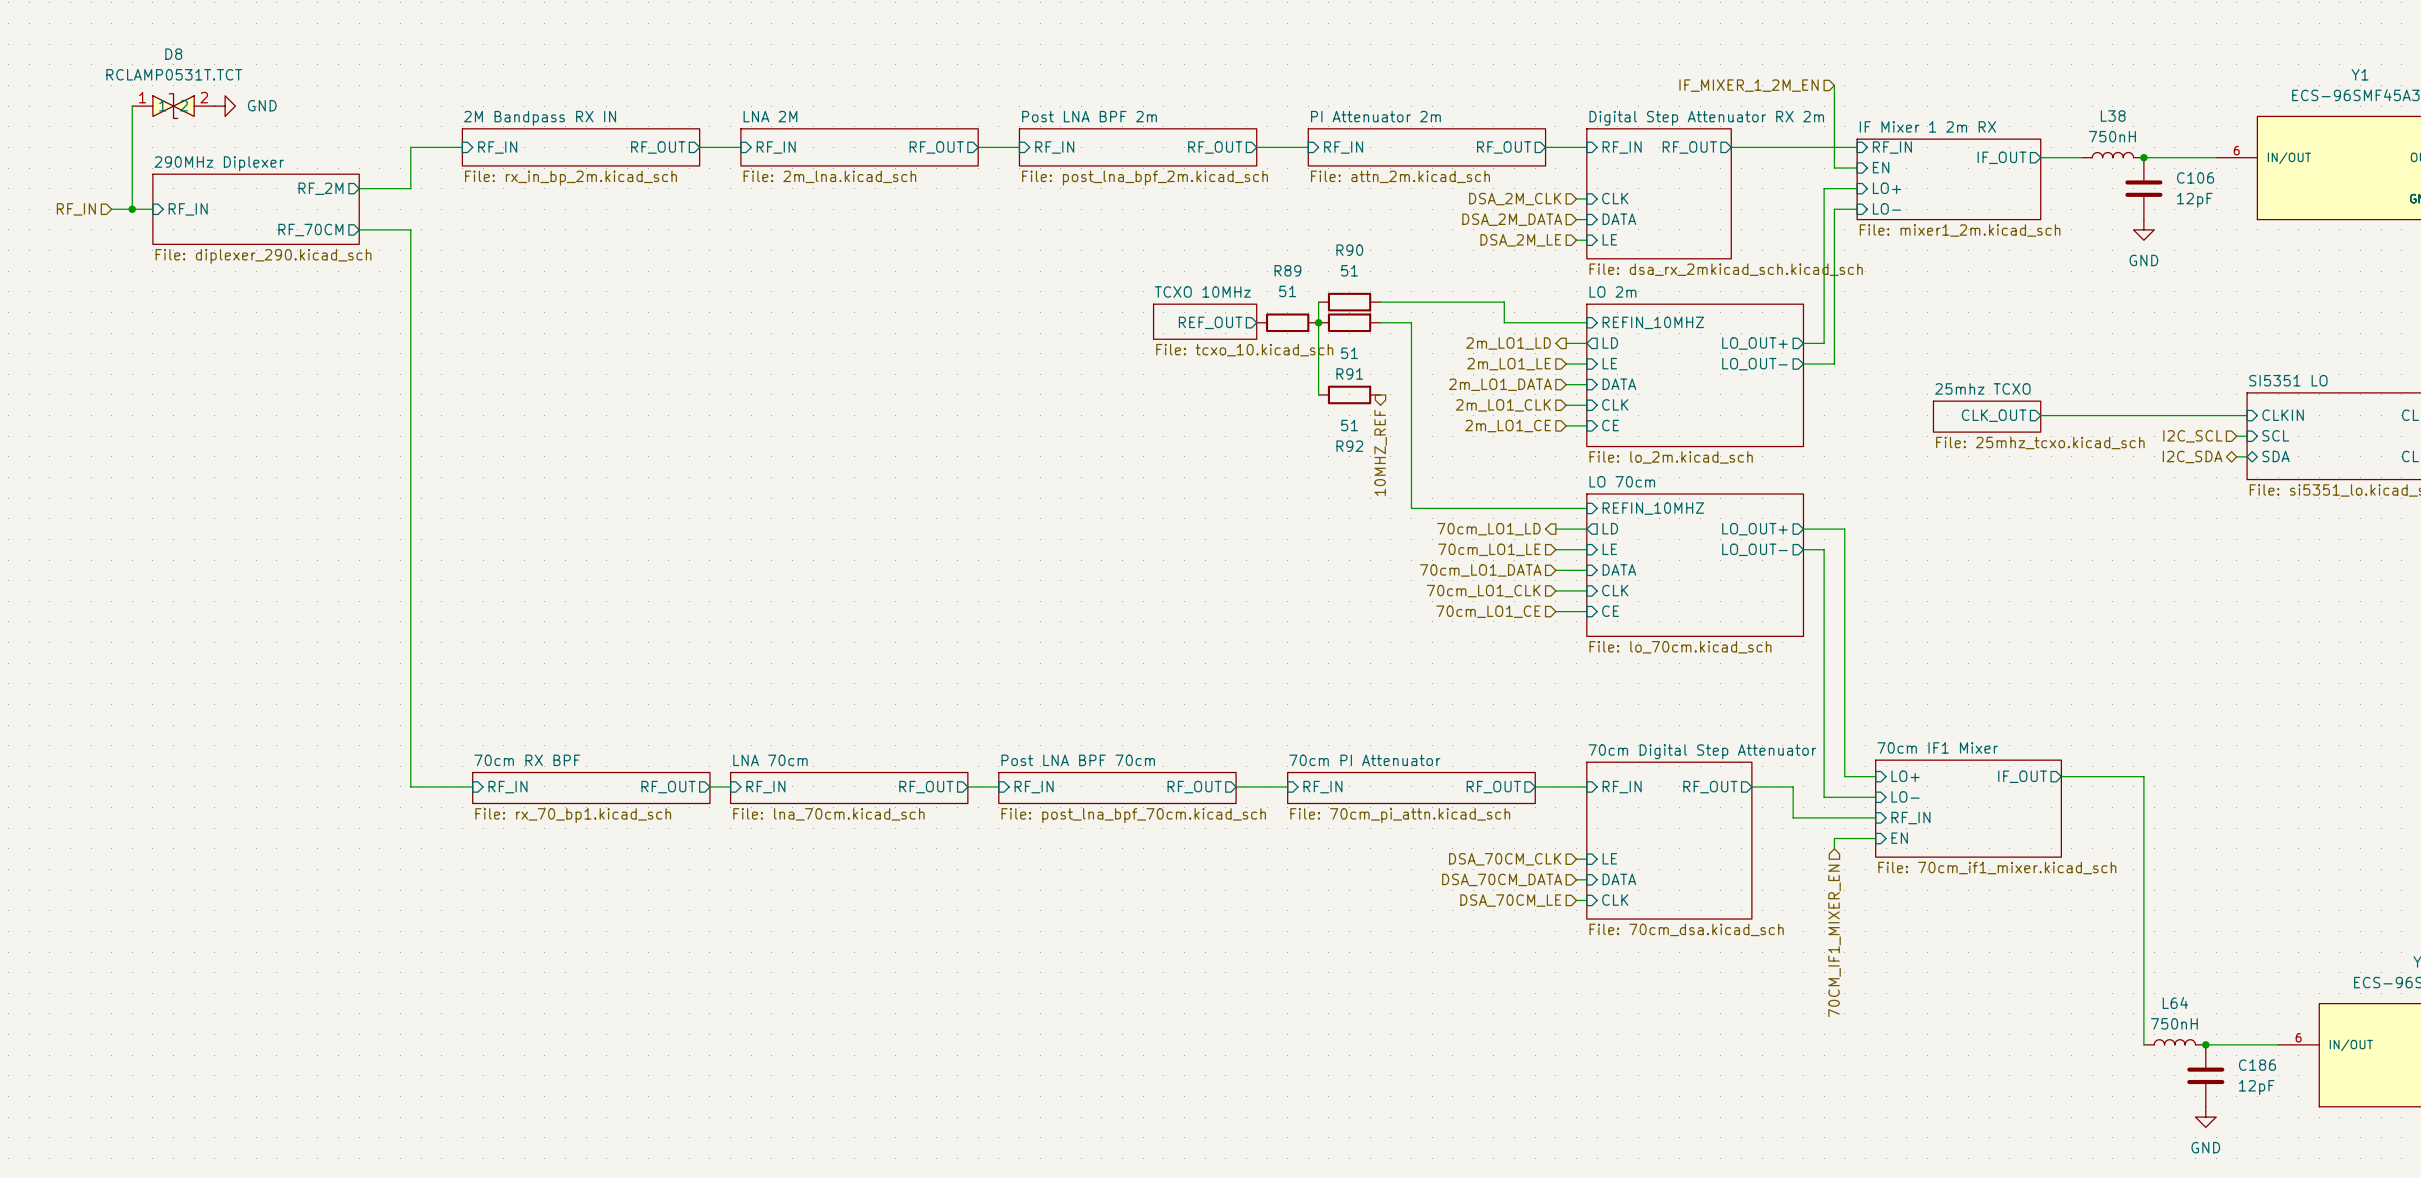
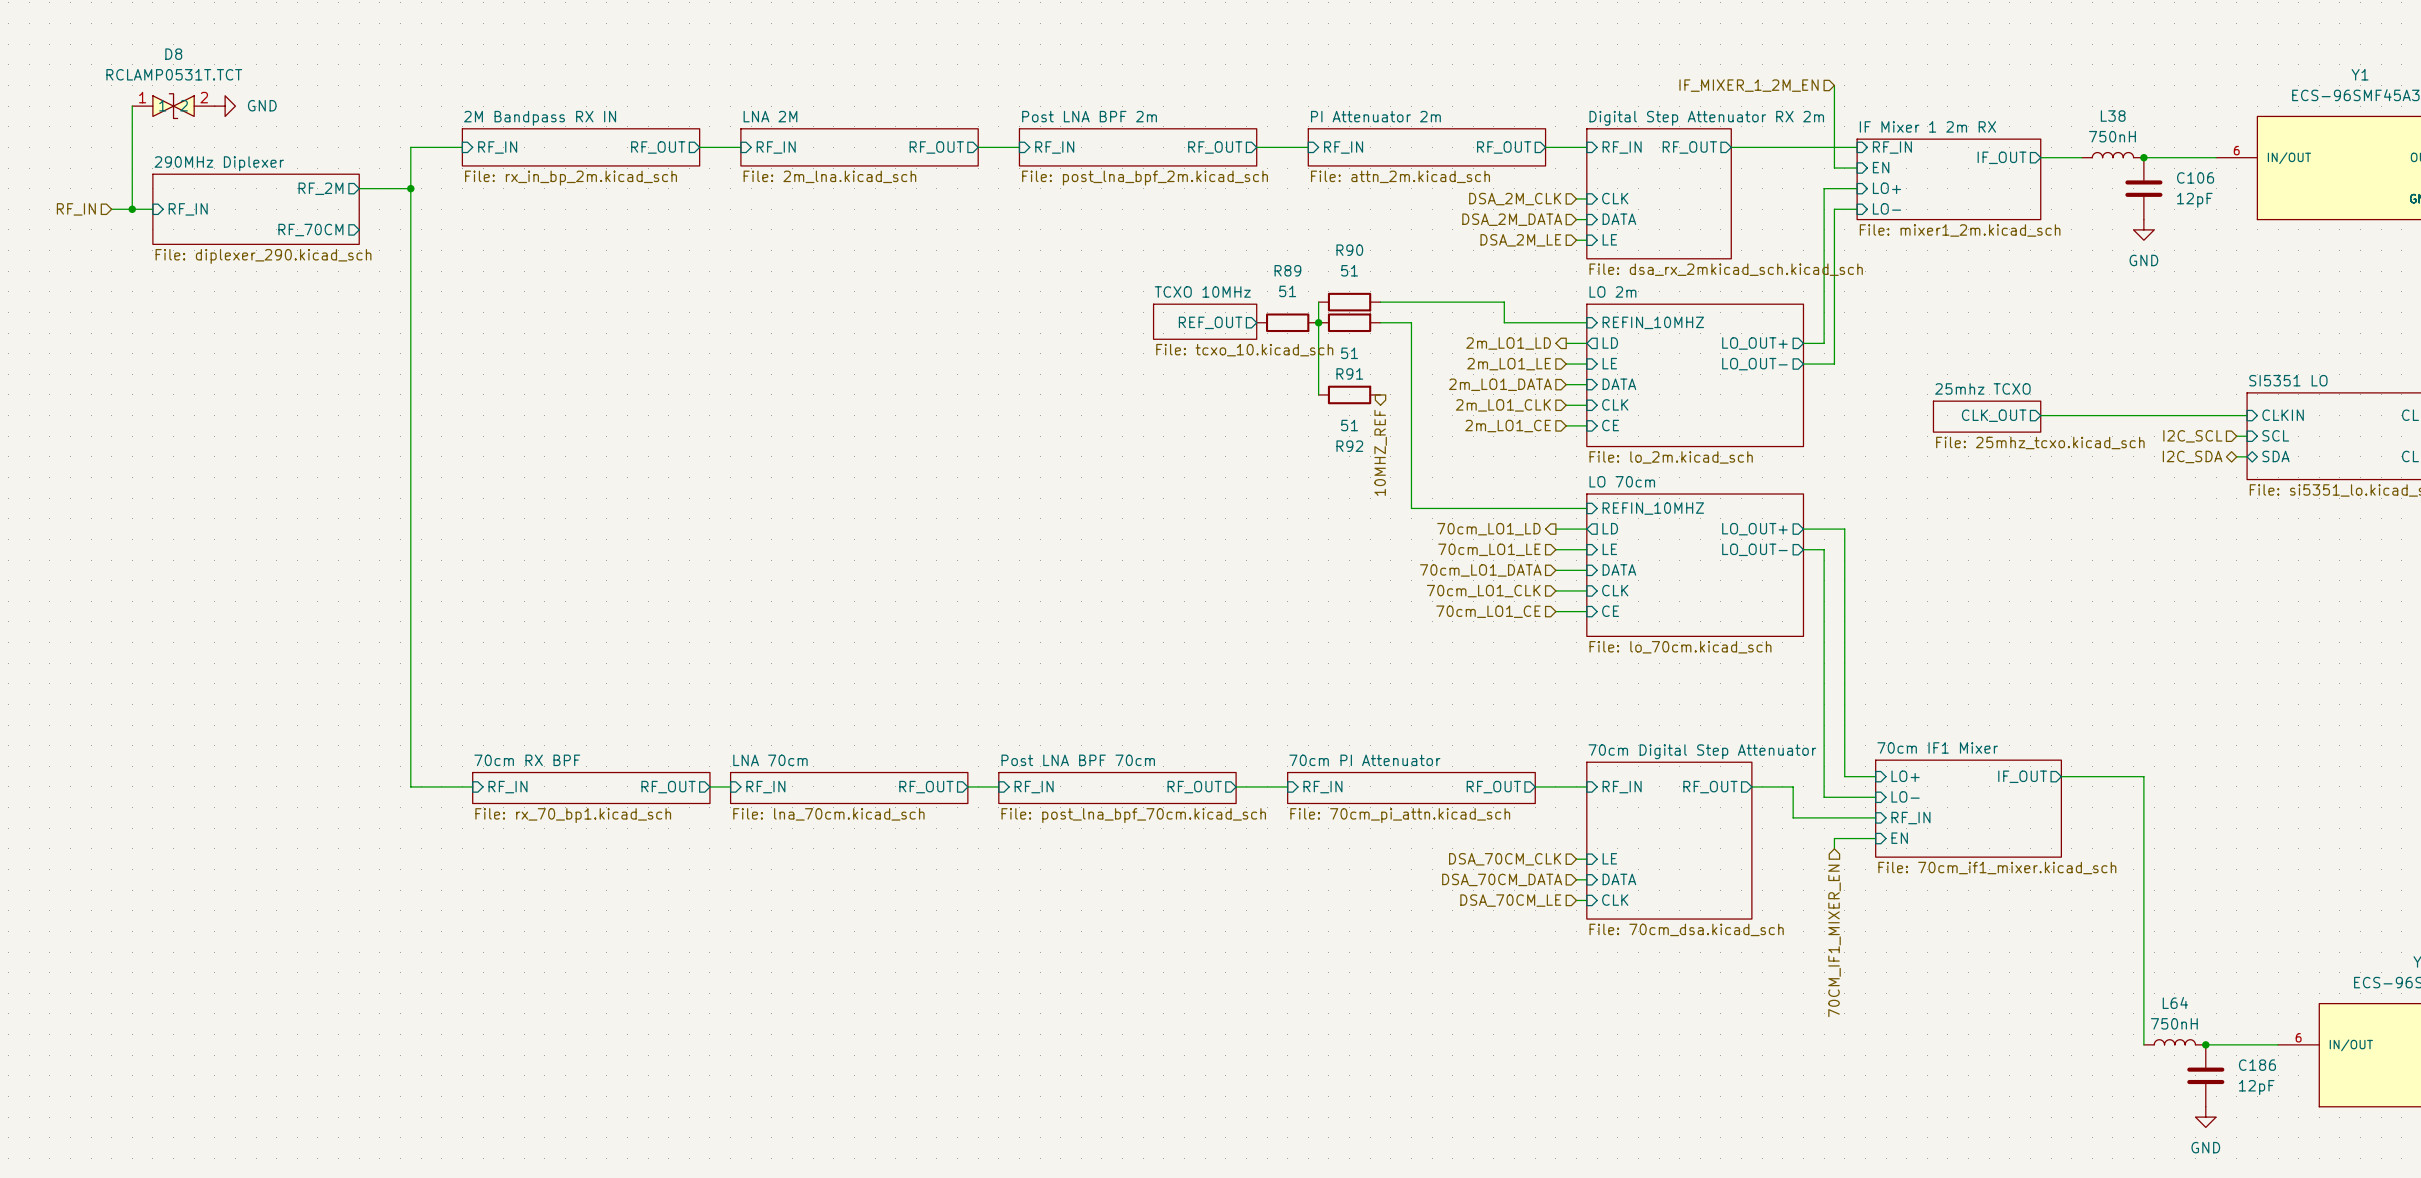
junction: none -> (410, 188)
wire: (359, 229) (410, 229) -> (410, 188) (410, 229)

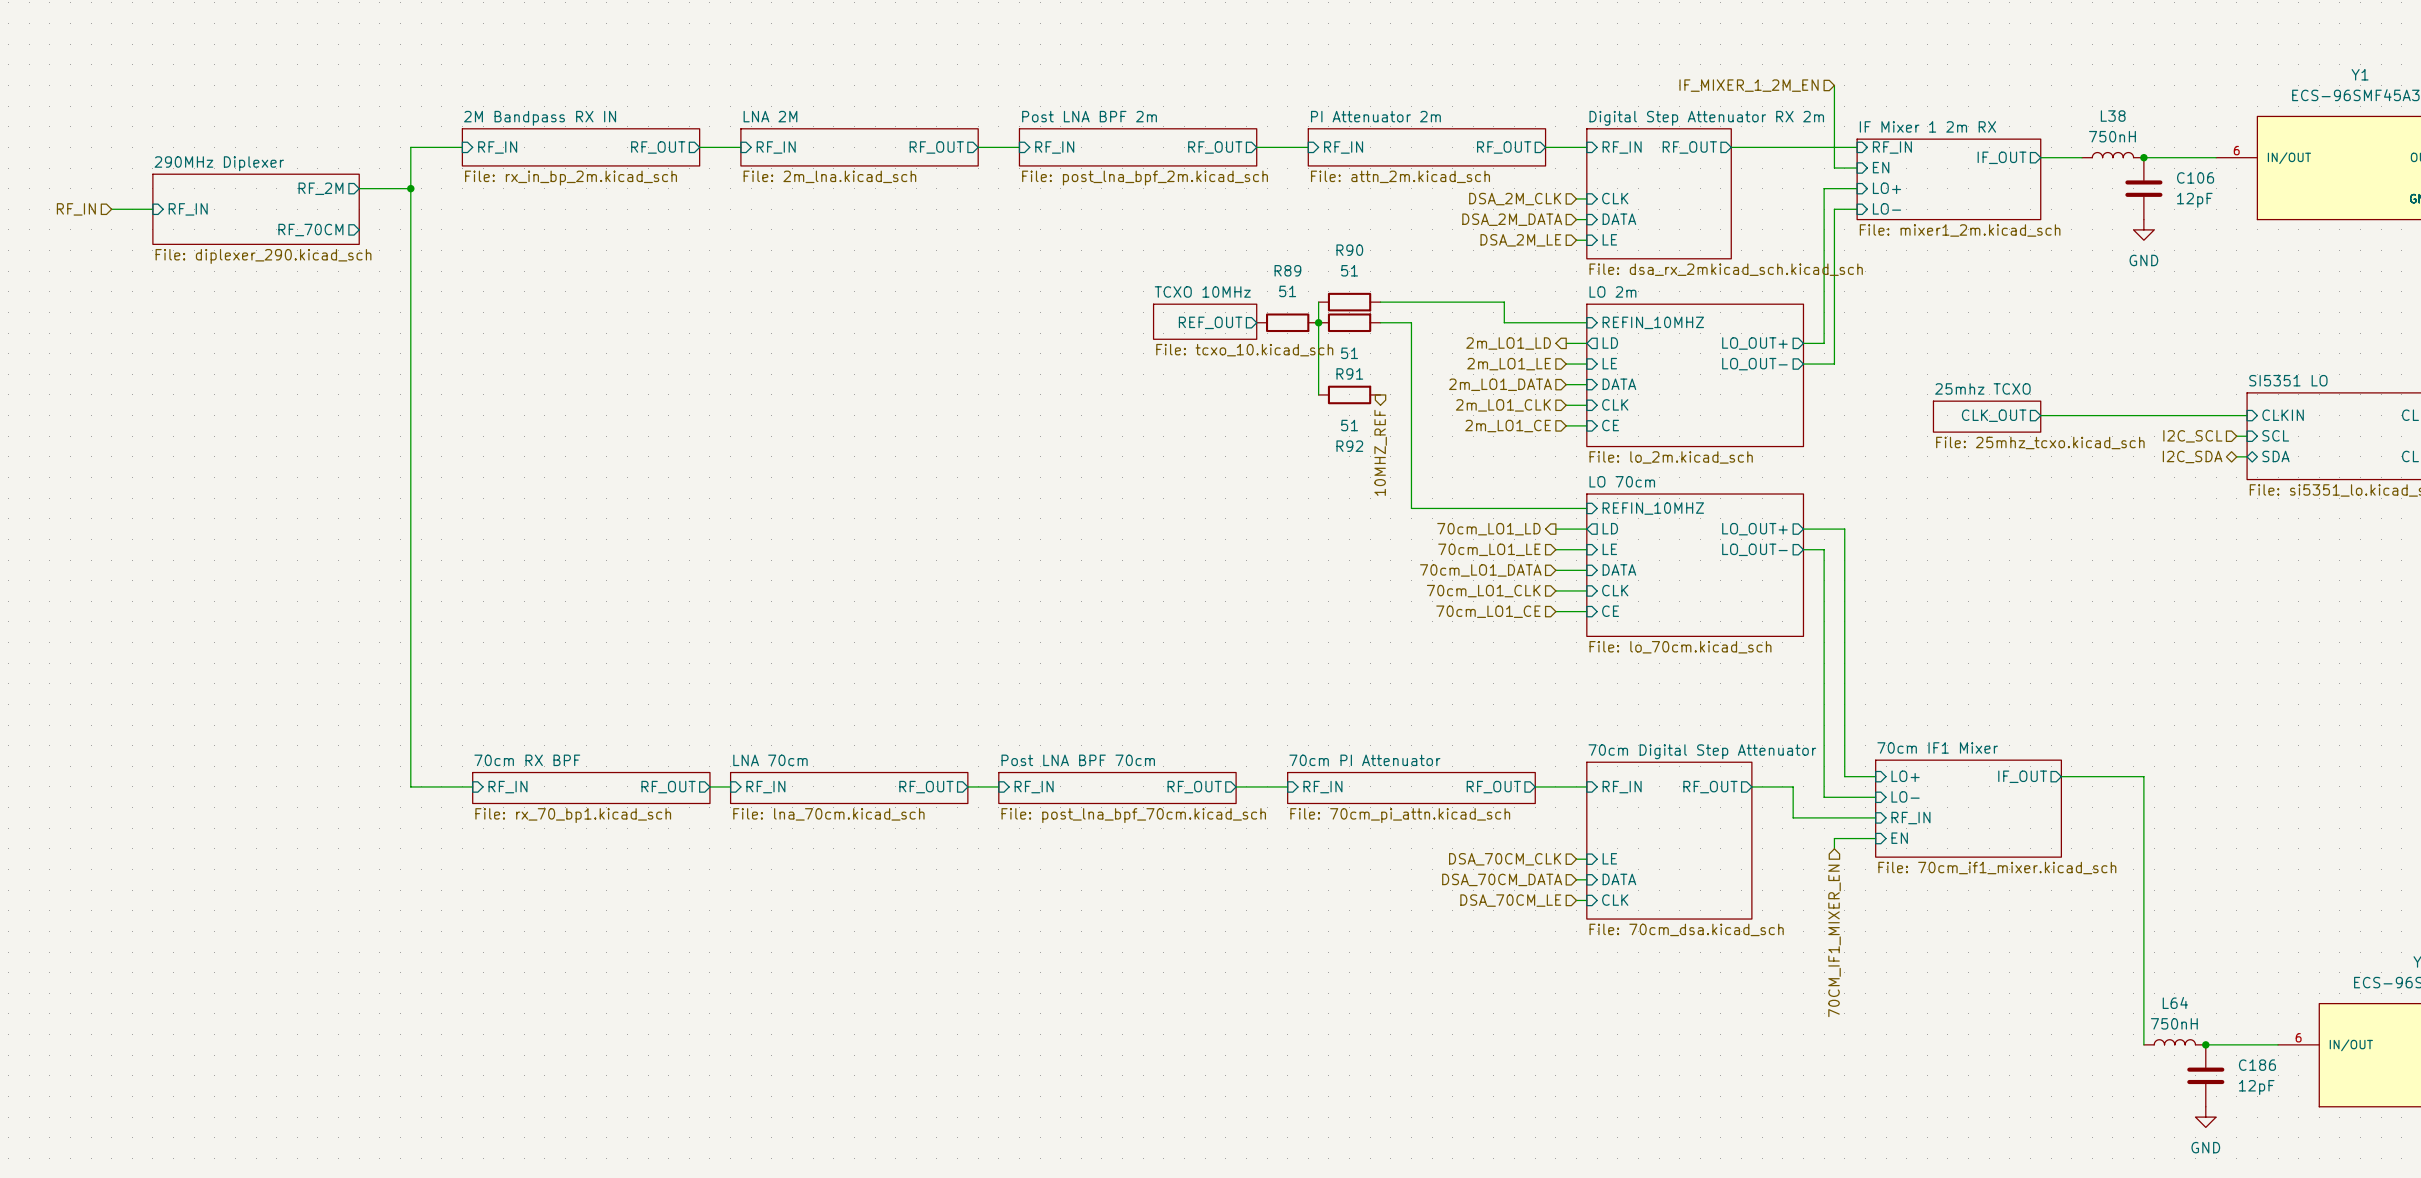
wire: (132, 106) (132, 209) -> none
D8: RCLAMP0531T.TCT (173, 106) -> none
power symbol: GND (225, 106) -> none
junction: (132, 209) -> none

